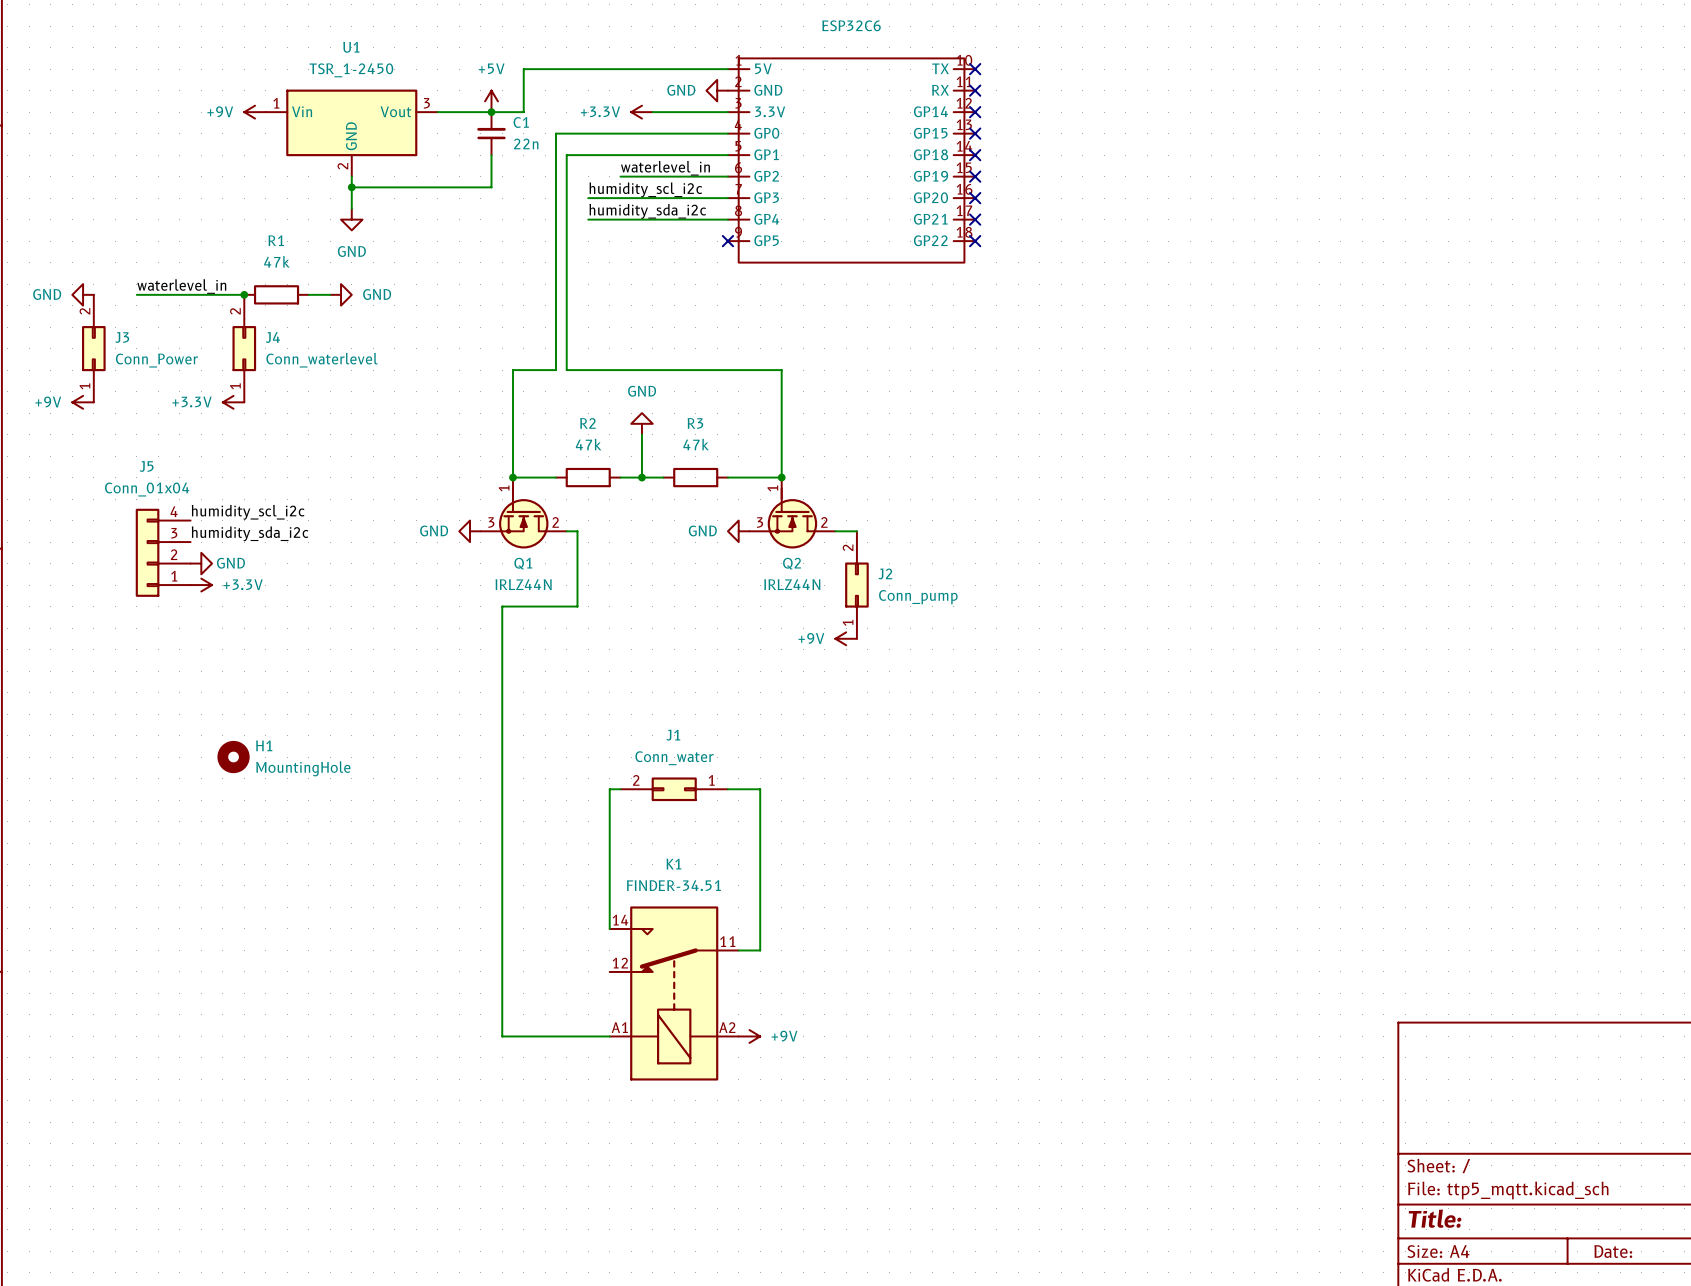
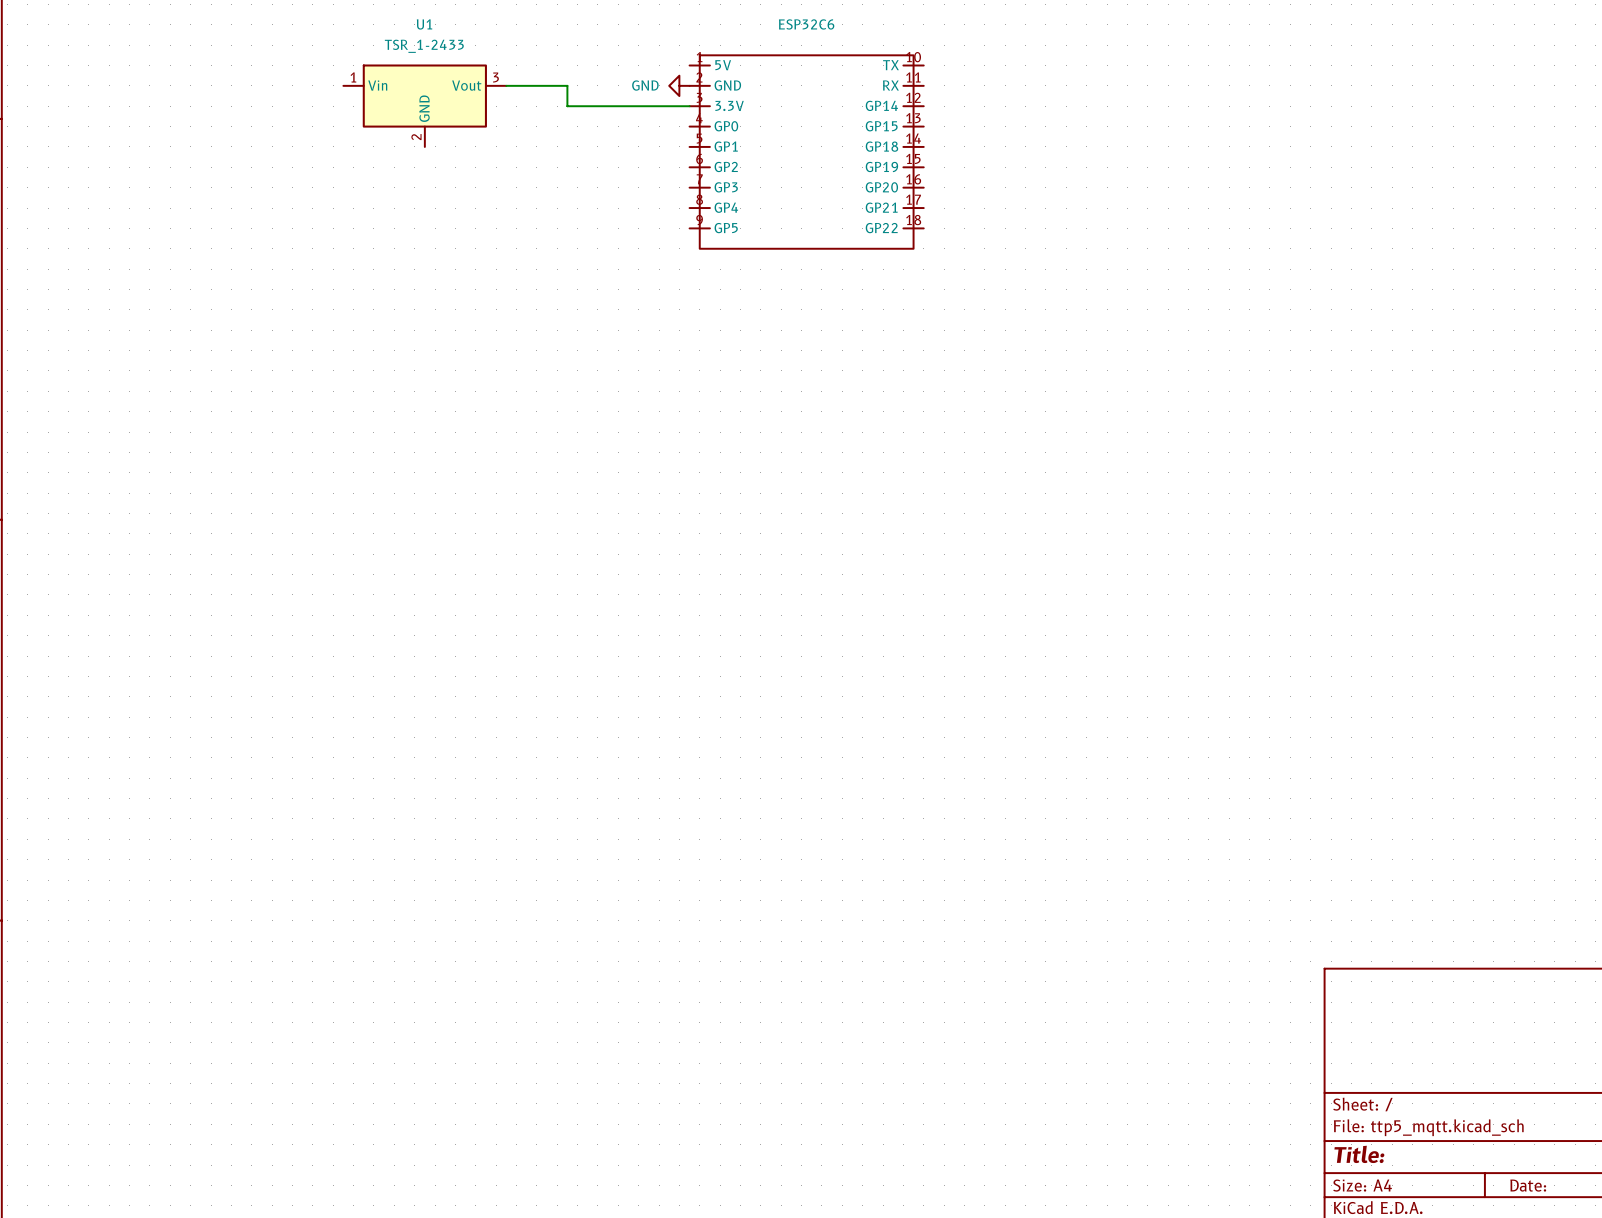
wire: (727, 69) (523, 69) (523, 112) (437, 112) -> none
no-connect mark: (975, 69) -> none
U1 value: TSR_1-2450 (351, 70) -> TSR_1-2433 (424, 46)
wire: none -> (506, 85) (567, 85) (567, 106) (618, 106)
no-connect mark: (975, 90) -> none
power symbol: +5V (491, 101) -> none
power symbol: +9V (255, 112) -> none
junction: (491, 112) -> none
power symbol: +3.3V (641, 112) -> none
no-connect mark: (975, 112) -> none
U1 position: (351, 133) -> (424, 105)
C1: 22n (491, 133) -> none
wire: (727, 133) (555, 133) (555, 370) (512, 370) (512, 477) (555, 477) -> none
no-connect mark: (975, 133) -> none
wire: (491, 155) (491, 187) (351, 187) -> none
wire: (727, 155) (566, 155) (566, 370) (781, 370) (781, 477) (727, 477) -> none
no-connect mark: (975, 155) -> none
label: waterlevel_in (665, 168) -> none
wire: (351, 176) (351, 208) -> none
wire: (620, 176) (727, 176) -> none
no-connect mark: (975, 176) -> none
junction: (351, 187) -> none
label: humidity_scl_i2c (645, 189) -> none
wire: (588, 198) (727, 198) -> none
no-connect mark: (975, 198) -> none
label: humidity_sda_i2c (647, 211) -> none
power symbol: GND (351, 219) -> none
wire: (588, 219) (727, 219) -> none
no-connect mark: (975, 219) -> none
no-connect mark: (727, 241) -> none
no-connect mark: (975, 241) -> none
label: waterlevel_in (181, 286) -> none
power symbol: GND (83, 294) -> none
wire: (136, 294) (244, 294) -> none
junction: (244, 294) -> none
R1: 47k (276, 294) -> none
wire: (308, 294) (330, 294) -> none
power symbol: GND (341, 294) -> none
J3: Conn_Power (93, 348) -> none
J4: Conn_waterlevel (244, 348) -> none
power symbol: +9V (83, 402) -> none
power symbol: +3.3V (233, 402) -> none
power symbol: GND (641, 423) -> none
wire: (641, 434) (641, 477) -> none
junction: (512, 477) -> none
R2: 47k (588, 477) -> none
wire: (620, 477) (663, 477) -> none
junction: (641, 477) -> none
R3: 47k (695, 477) -> none
junction: (781, 477) -> none
label: humidity_scl_i2c (248, 512) -> none
Q1: IRLZ44N (523, 513) -> none
Q2: IRLZ44N (792, 513) -> none
power symbol: GND (470, 531) -> none
wire: (566, 531) (577, 531) (577, 606) (502, 606) (502, 1036) (609, 1036) -> none
power symbol: GND (738, 531) -> none
wire: (835, 531) (856, 531) -> none
label: humidity_sda_i2c (250, 533) -> none
J5: Conn_01x04 (163, 552) -> none
power symbol: GND (201, 563) -> none
power symbol: +3.3V (201, 585) -> none
J2: Conn_pump (856, 585) -> none
power symbol: +9V (846, 638) -> none
H1: MountingHole (233, 757) -> none
wire: (620, 789) (609, 789) (609, 928) -> none
J1: Conn_water (674, 789) -> none
wire: (727, 789) (760, 789) (760, 950) (738, 950) -> none
K1: FINDER-34.51 (674, 993) -> none
power symbol: +9V (749, 1036) -> none

